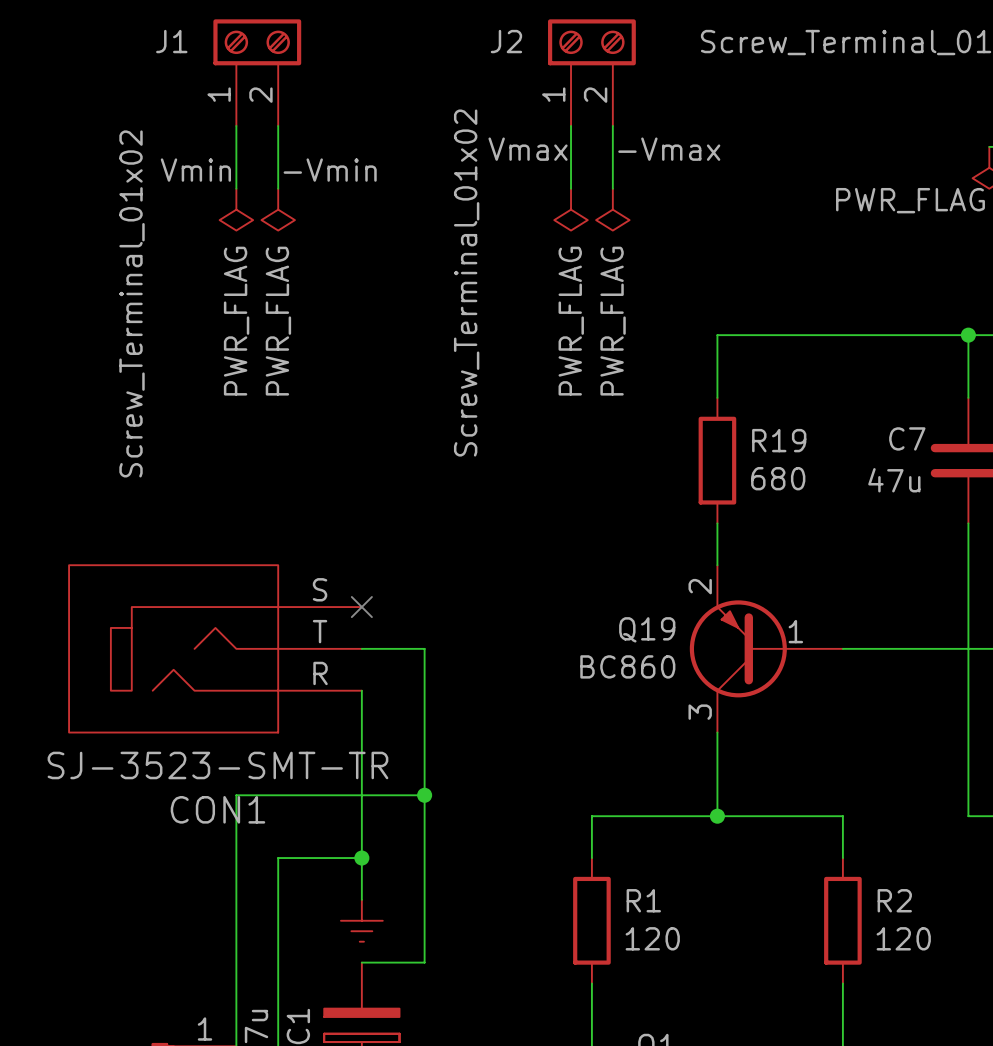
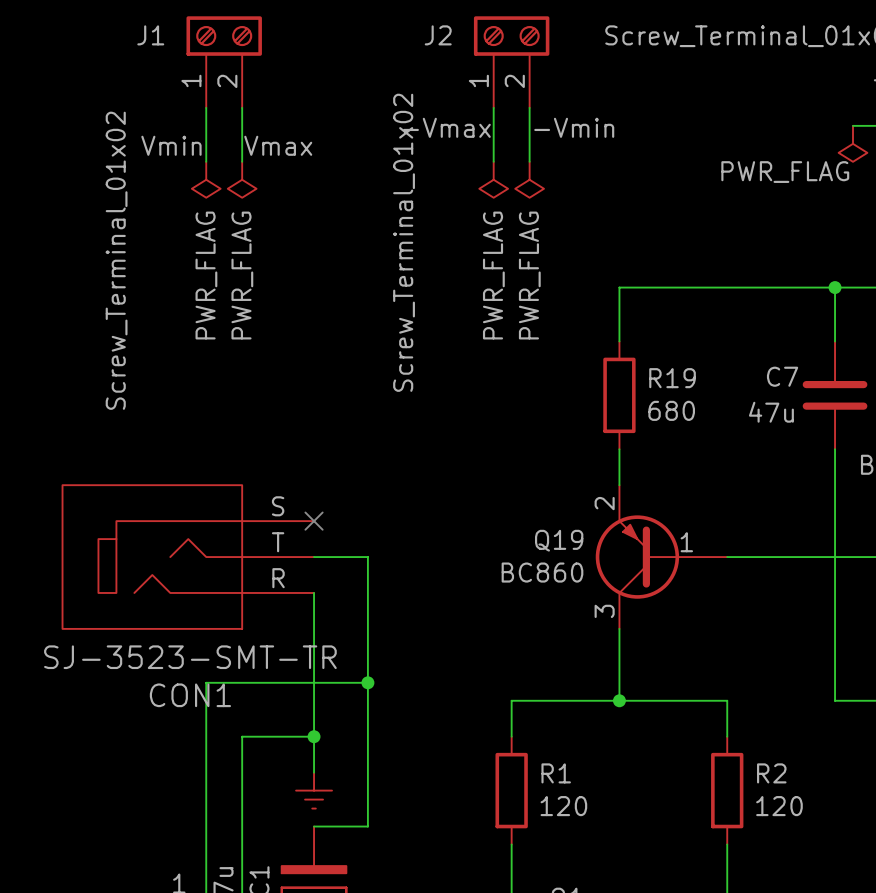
label: Vmax (528, 149) -> -Vmax (446, 127)
label: -Vmax (669, 149) -> -Vmin (574, 127)
label: -Vmin (330, 170) -> Vmax (278, 145)

